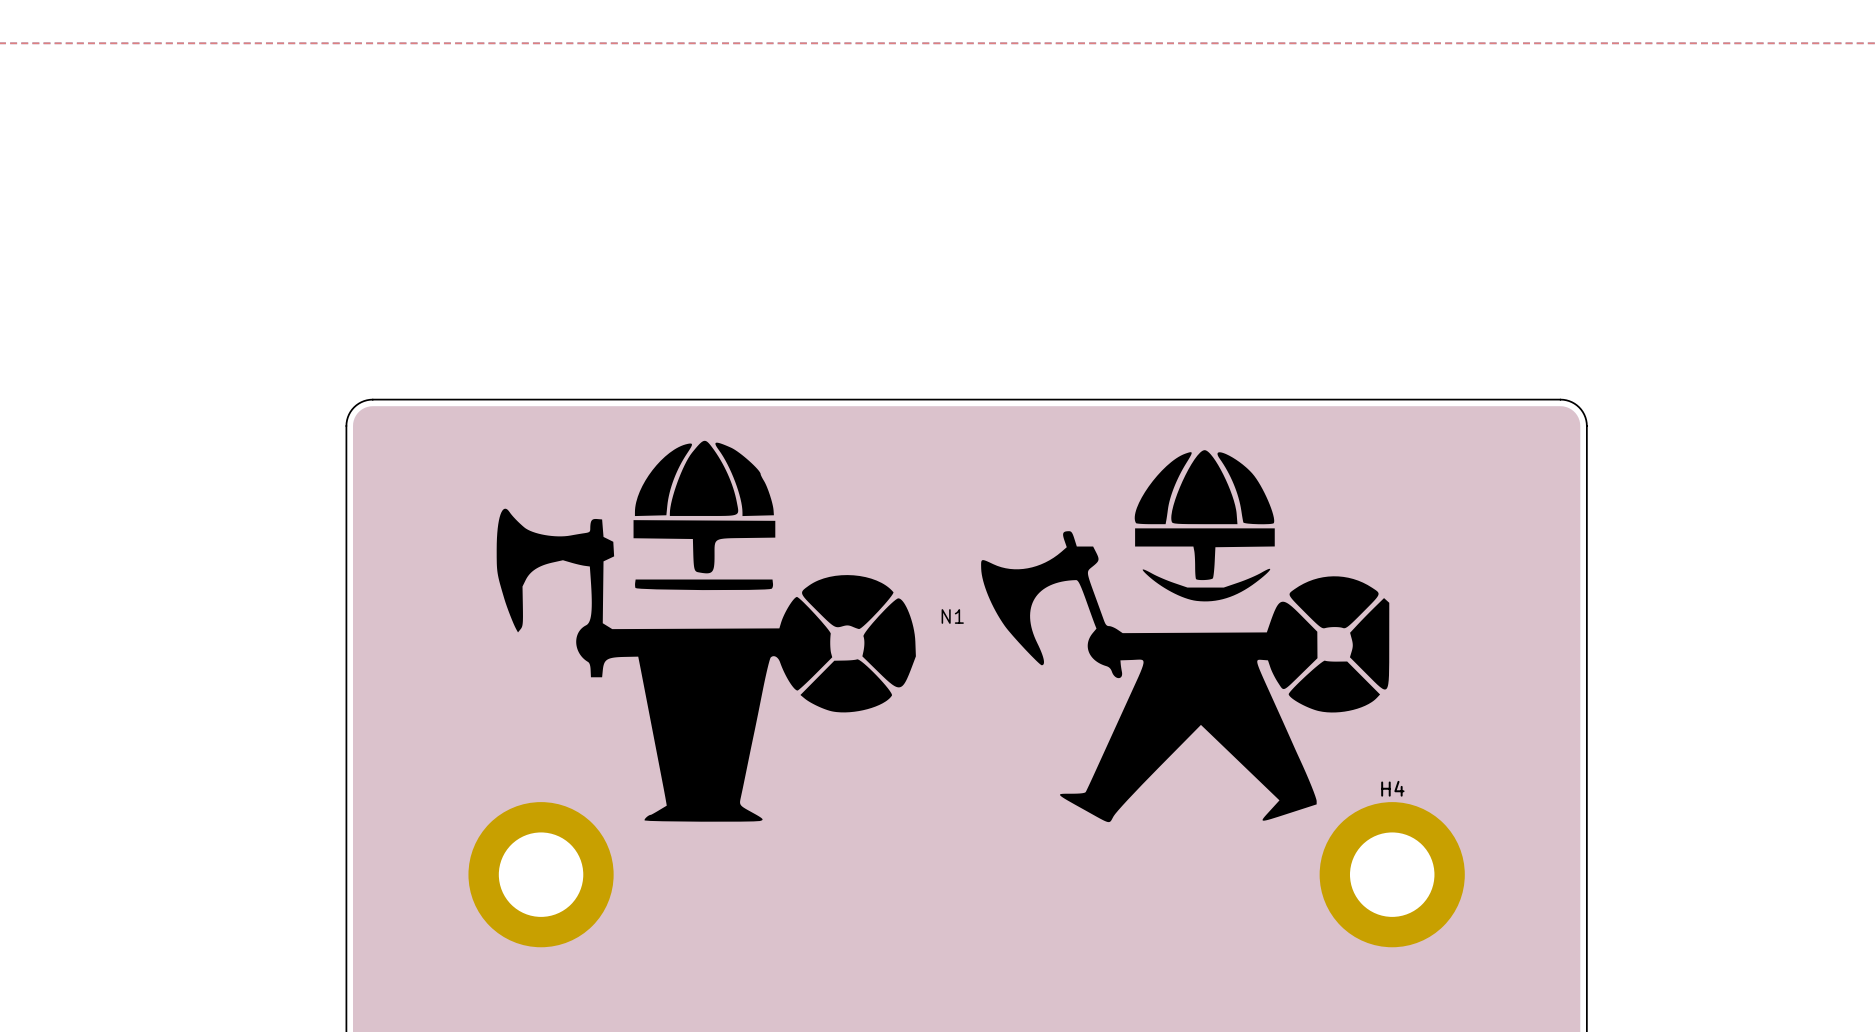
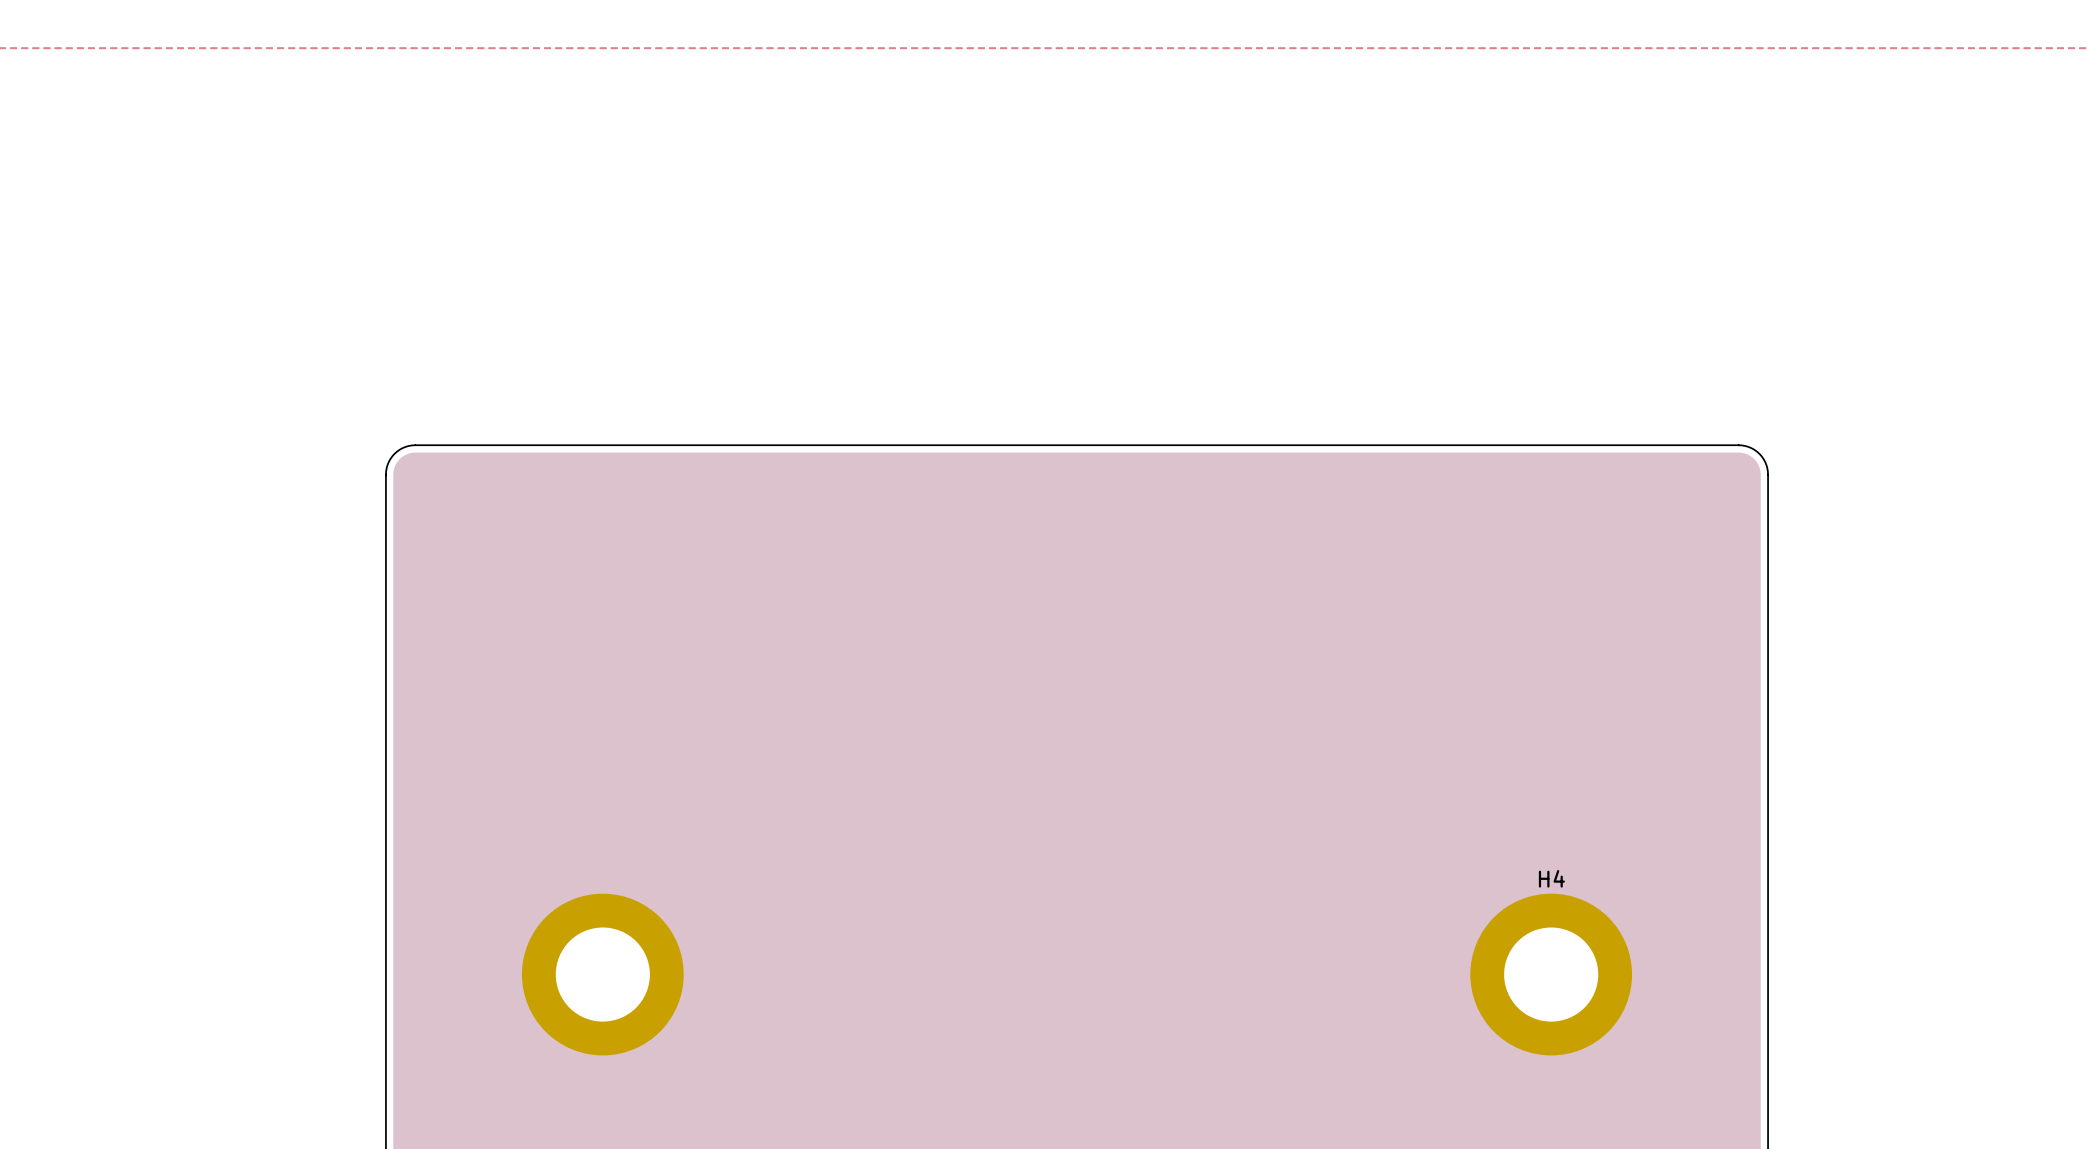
N1: (942, 631) -> none

